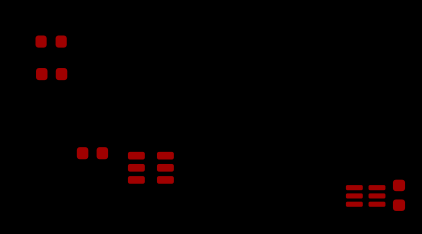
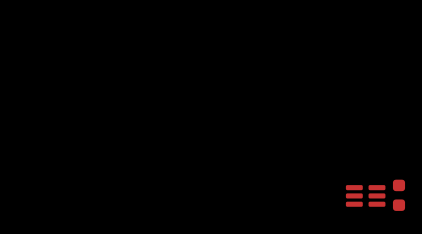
part: (51, 41) -> none
part: (51, 74) -> none
part: (92, 153) -> none
part: (150, 167) -> none

